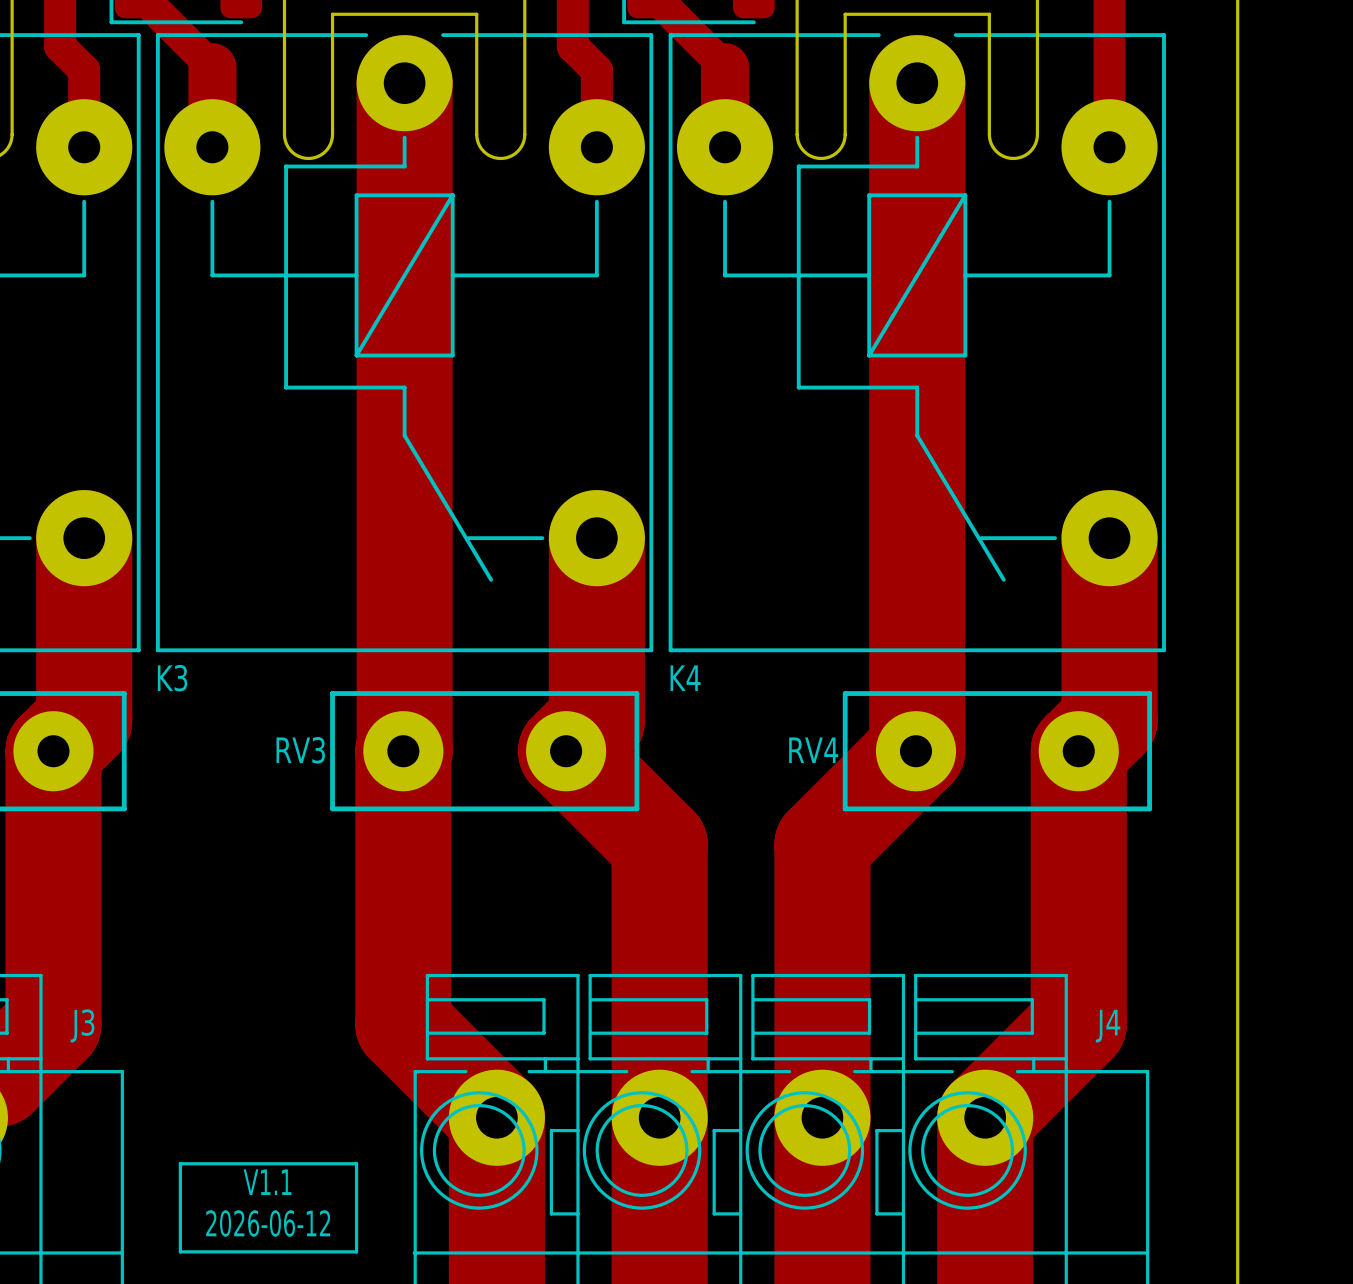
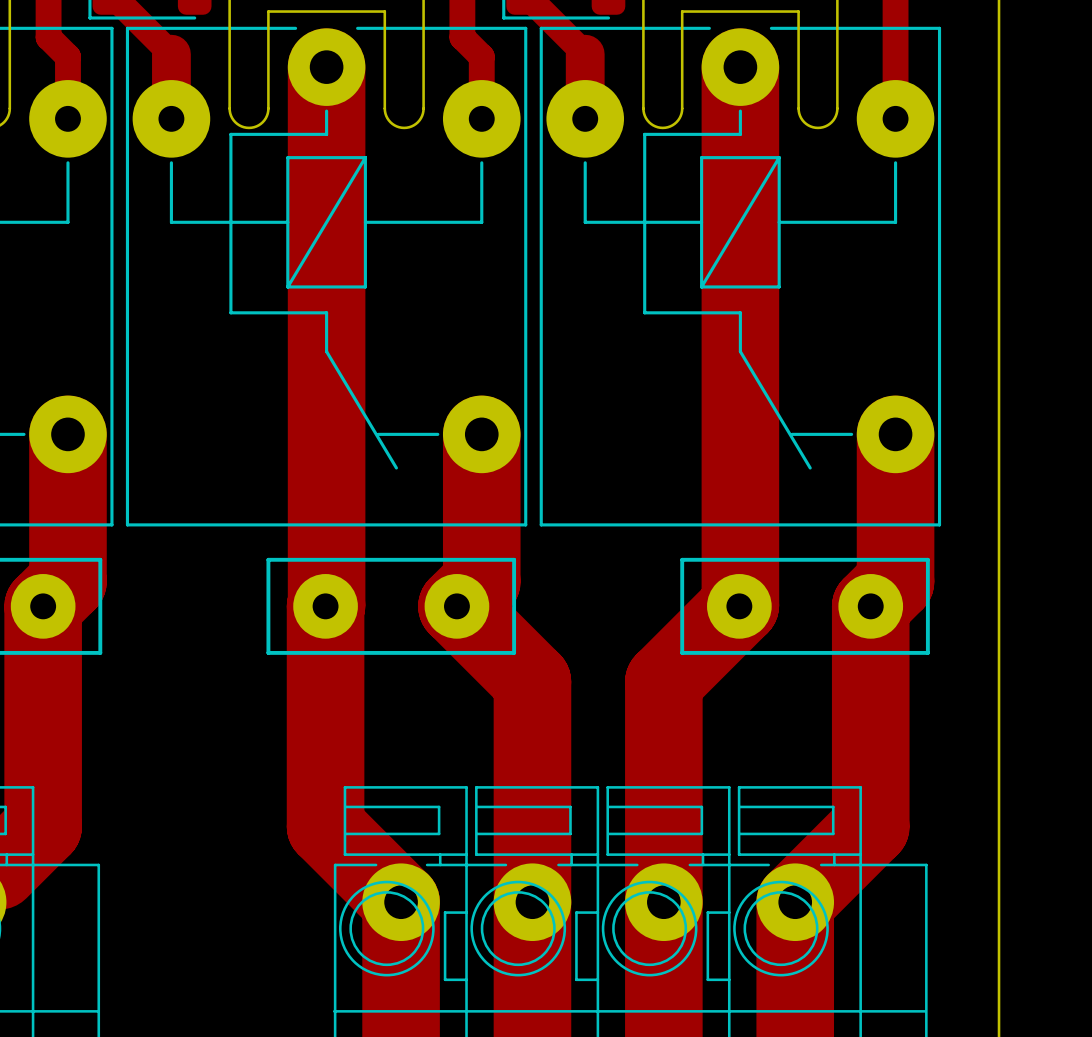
K3 name: K3 (172, 678) -> none
K4 name: K4 (685, 678) -> none
RV3 name: RV3 (300, 750) -> none
RV4 name: RV4 (813, 750) -> none
J3 name: J3 (82, 1025) -> none
J4 name: J4 (1108, 1026) -> none
line: (180, 1163) (356, 1163) (356, 1251) (180, 1251) (180, 1163) -> none
text: V1.1 (267, 1182) -> none
text: 2026-06-12 (268, 1223) -> none

